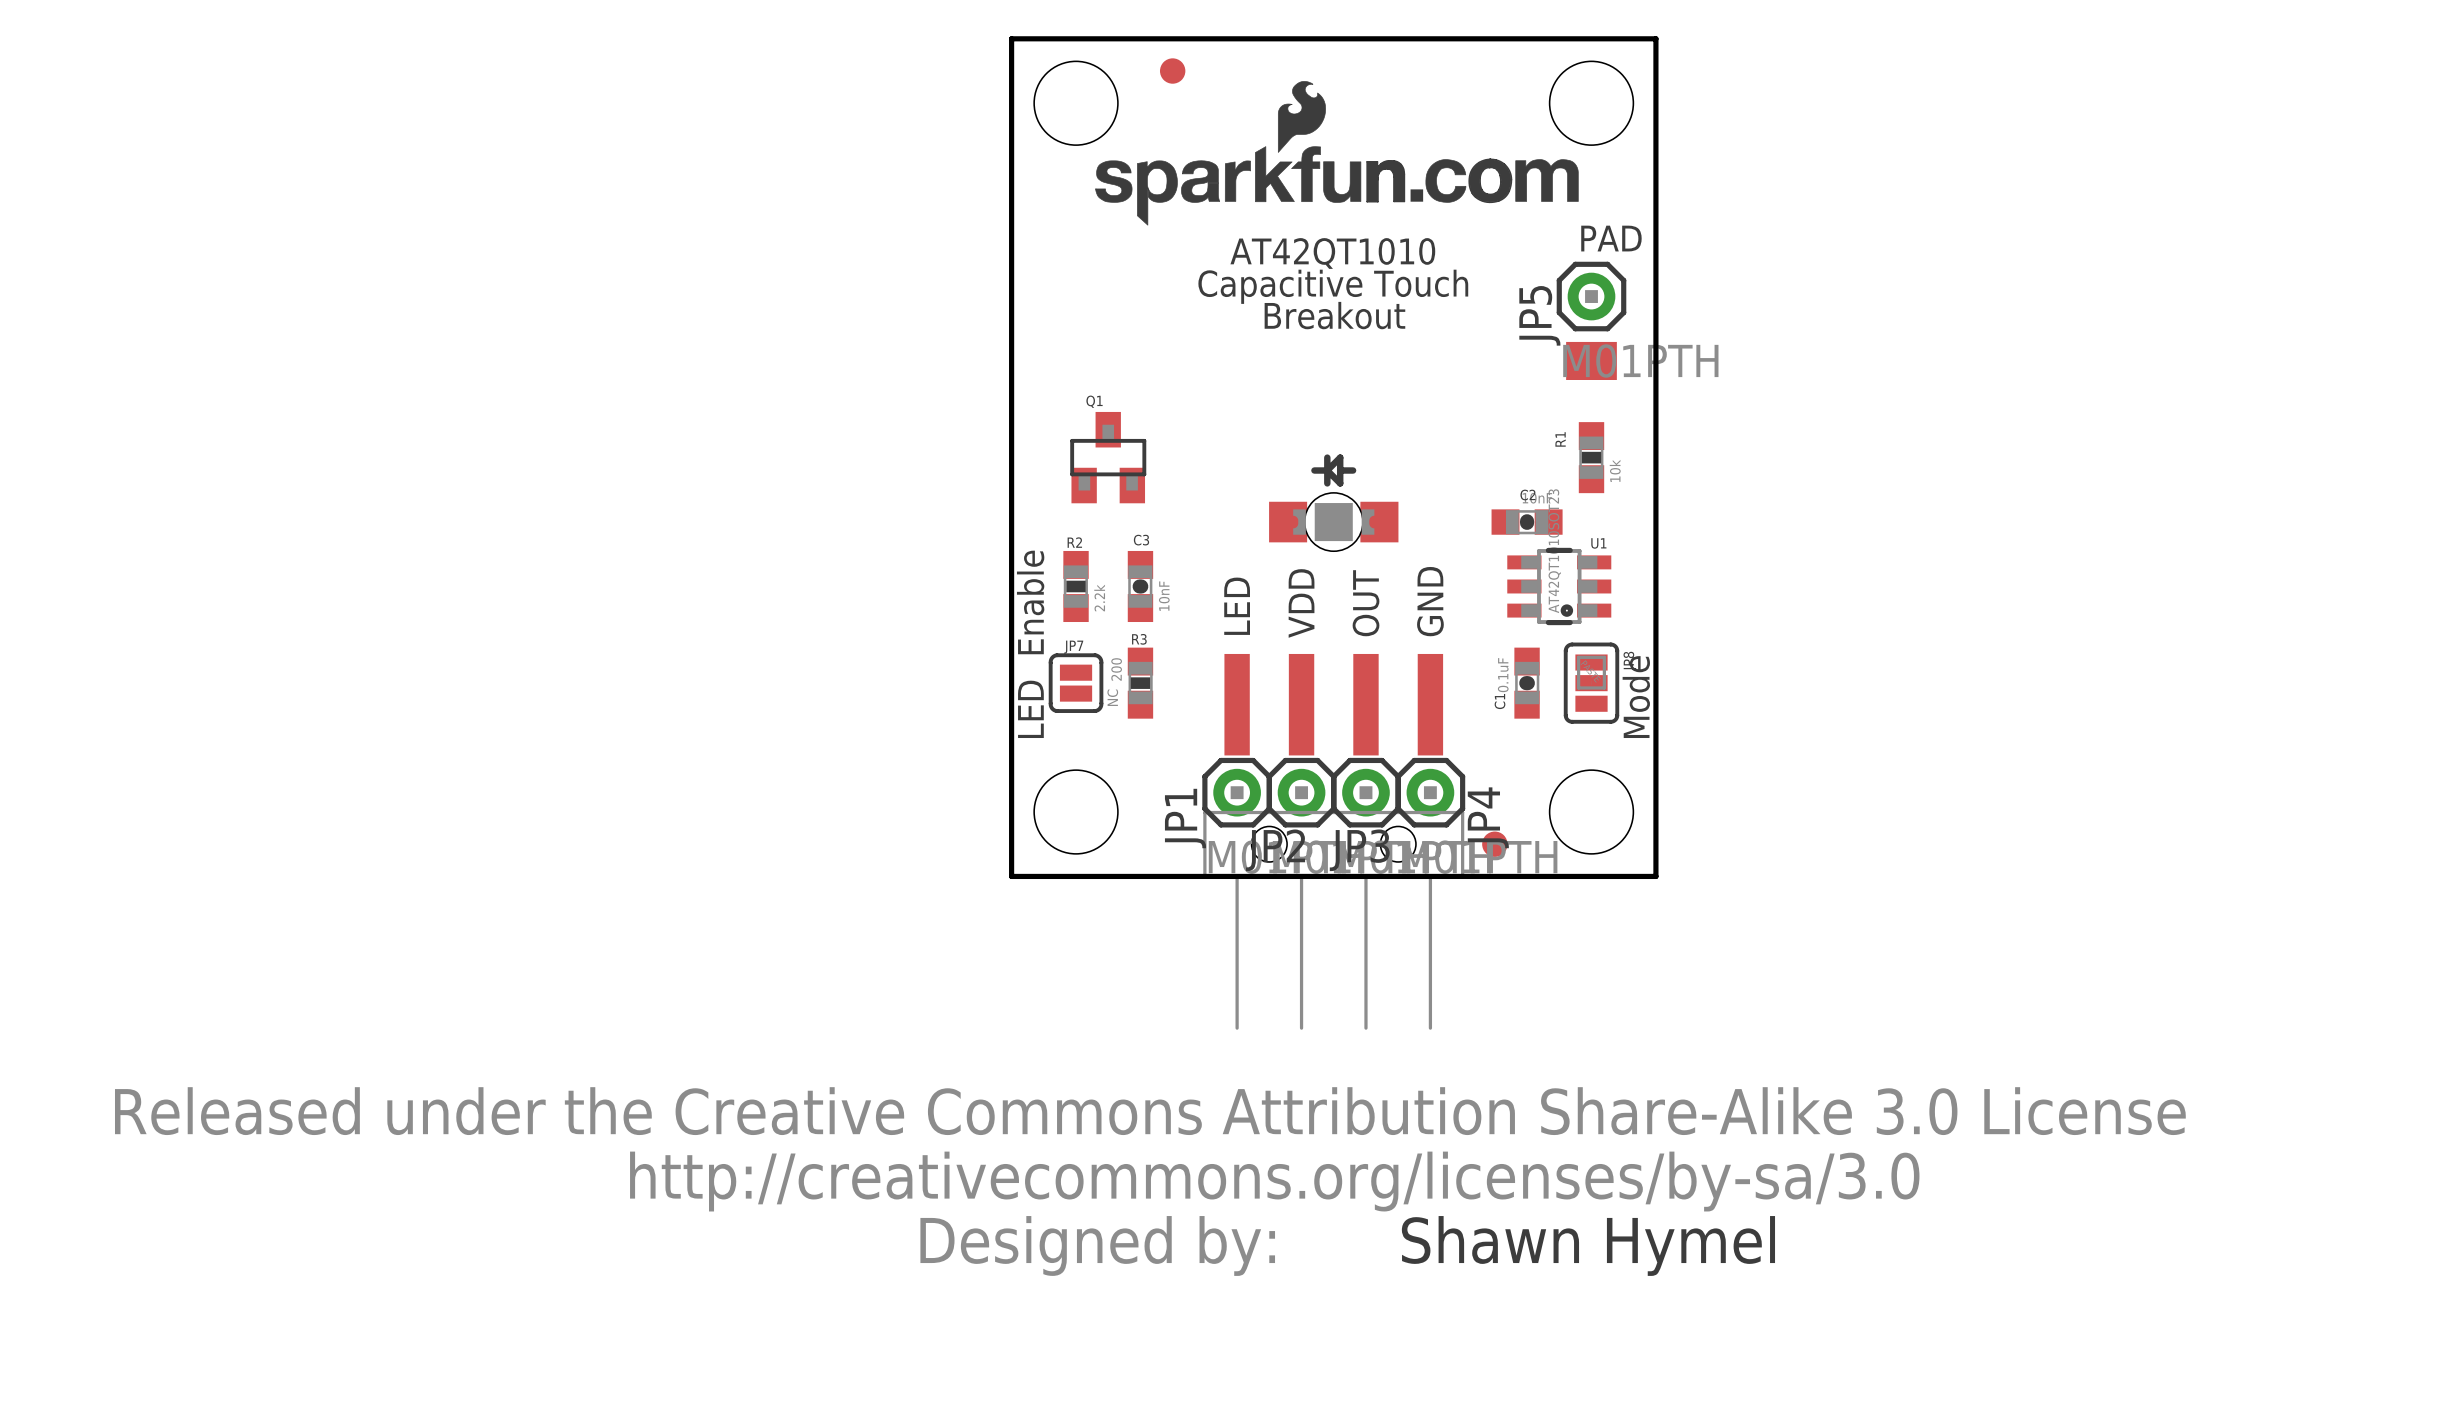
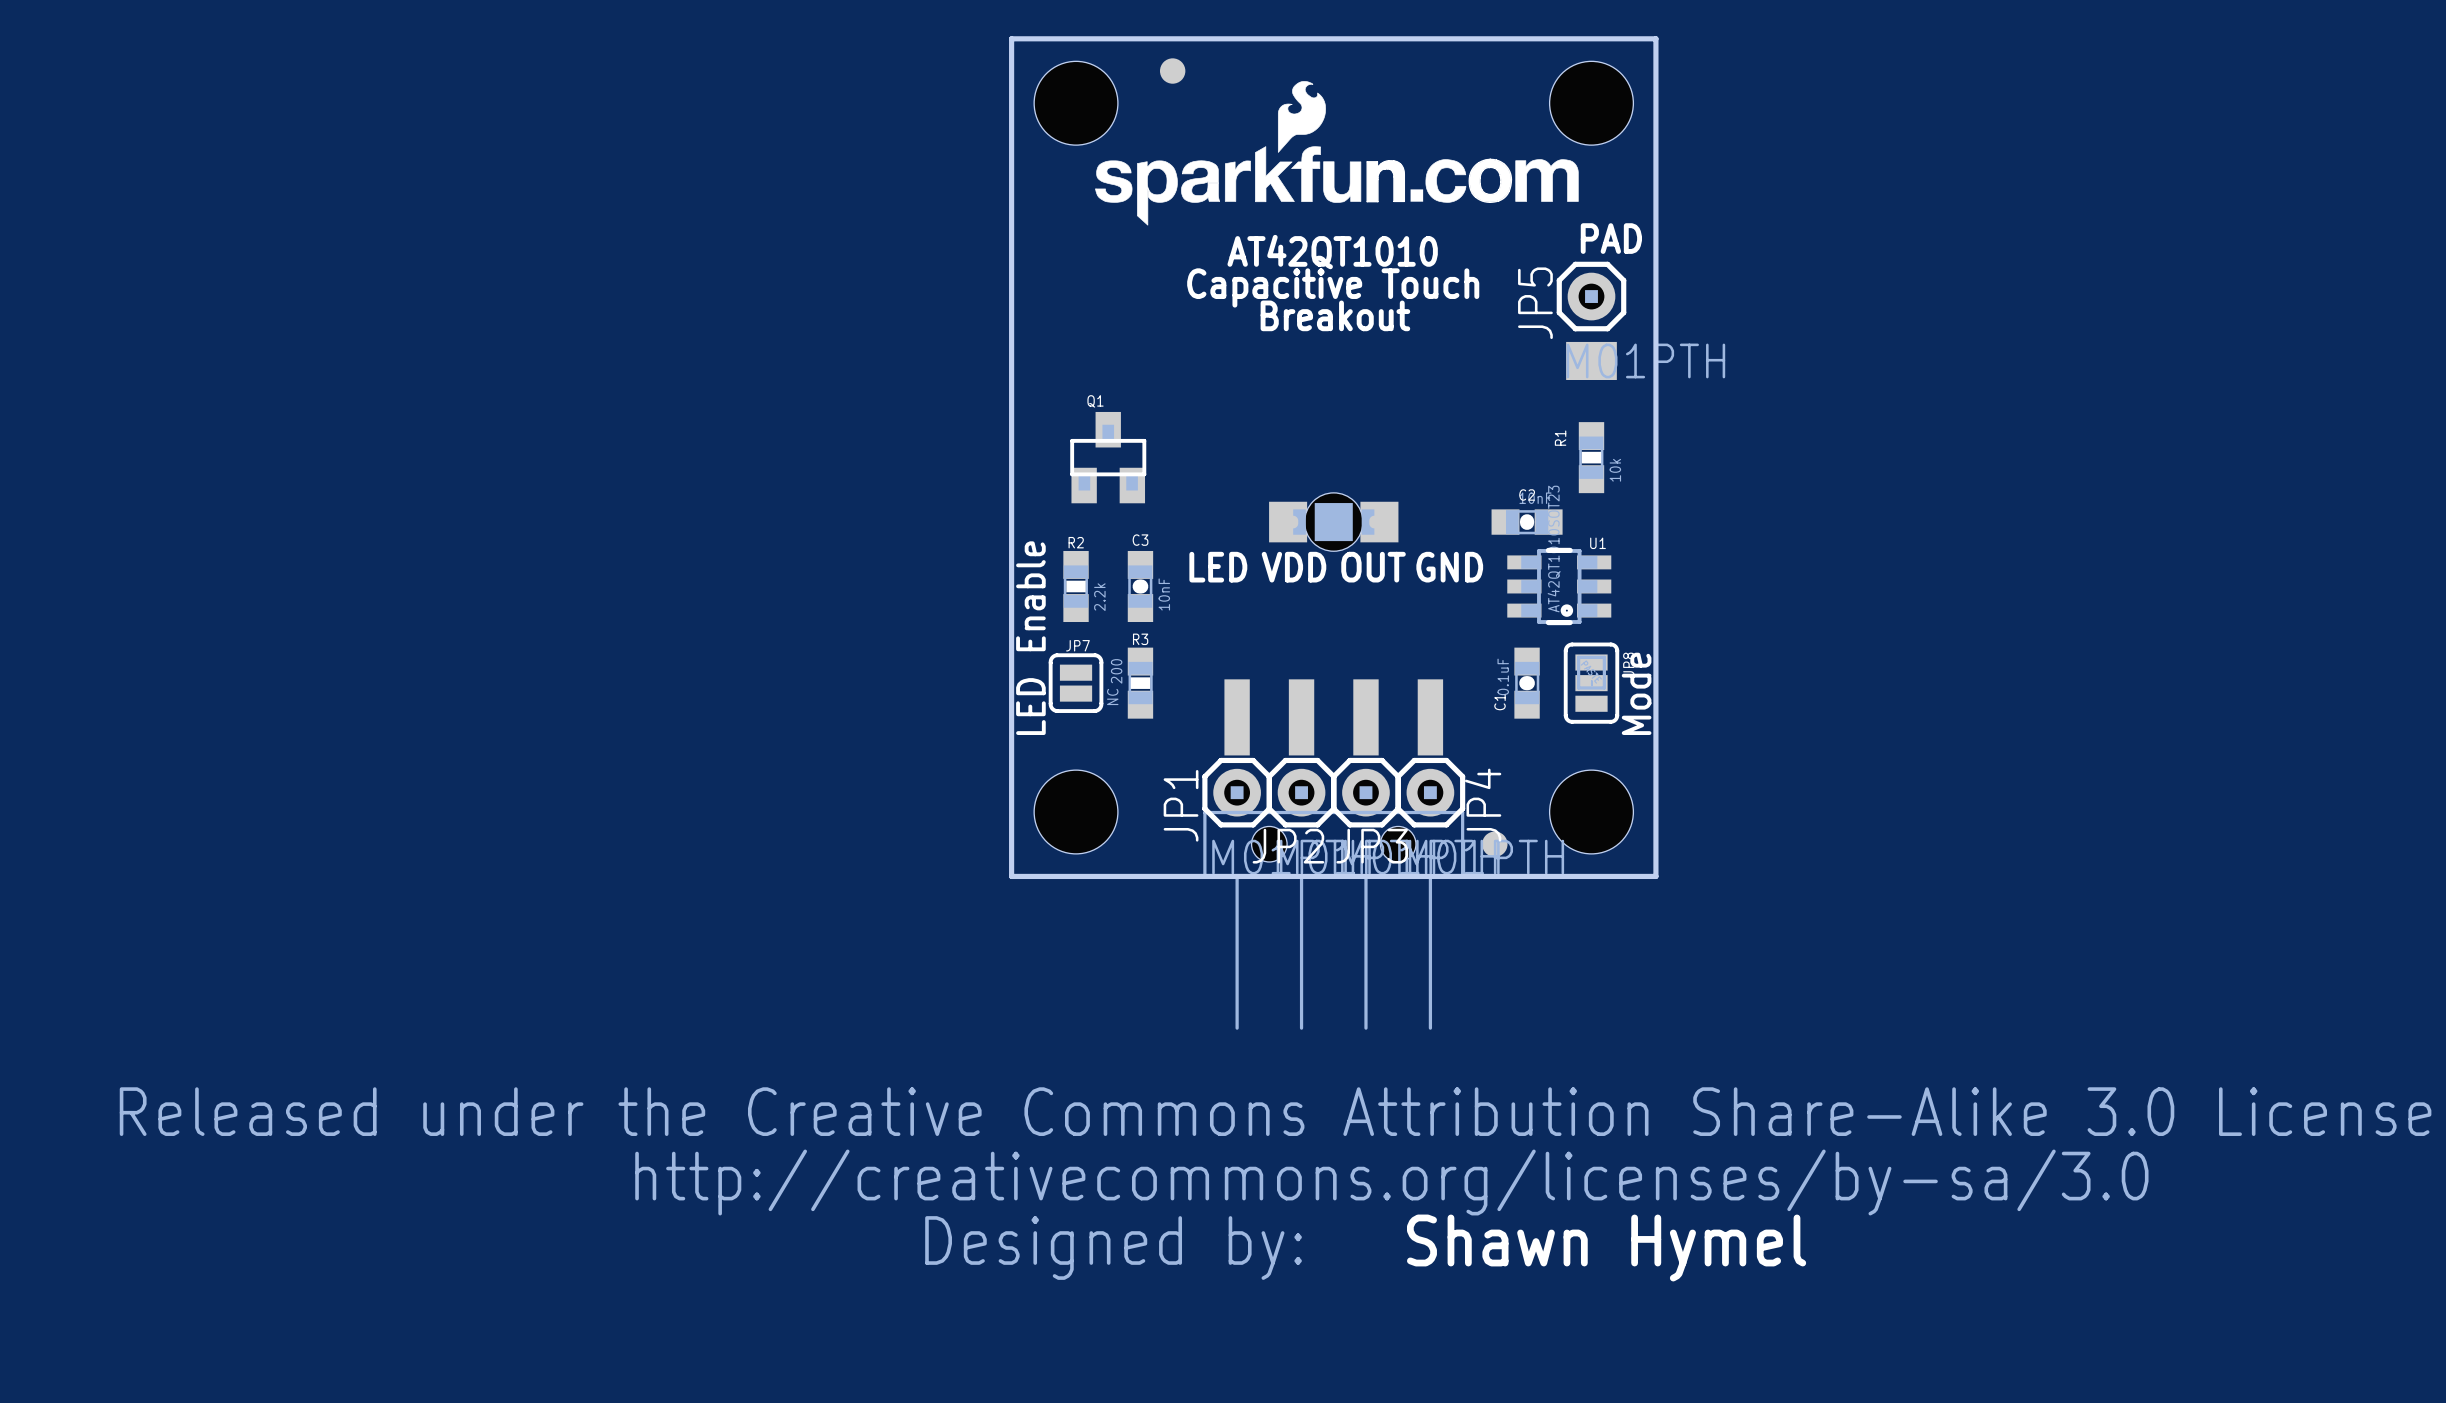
line: (1327, 457) (1327, 483) -> none
line: (1314, 470) (1327, 470) -> none
line: (1327, 470) (1340, 457) (1340, 483) (1327, 470) -> none
line: (1340, 470) (1353, 470) -> none
text rotation: 0° (1430, 601) -> 90° clockwise (1449, 567)
text rotation: 0° (1301, 603) -> 90° clockwise (1294, 567)
text rotation: 0° (1366, 603) -> 90° clockwise (1373, 567)
text rotation: 0° (1237, 606) -> 90° clockwise (1218, 567)
part footprint: [1203, 653, 1465, 1030] -> [1203, 679, 1465, 1030]

